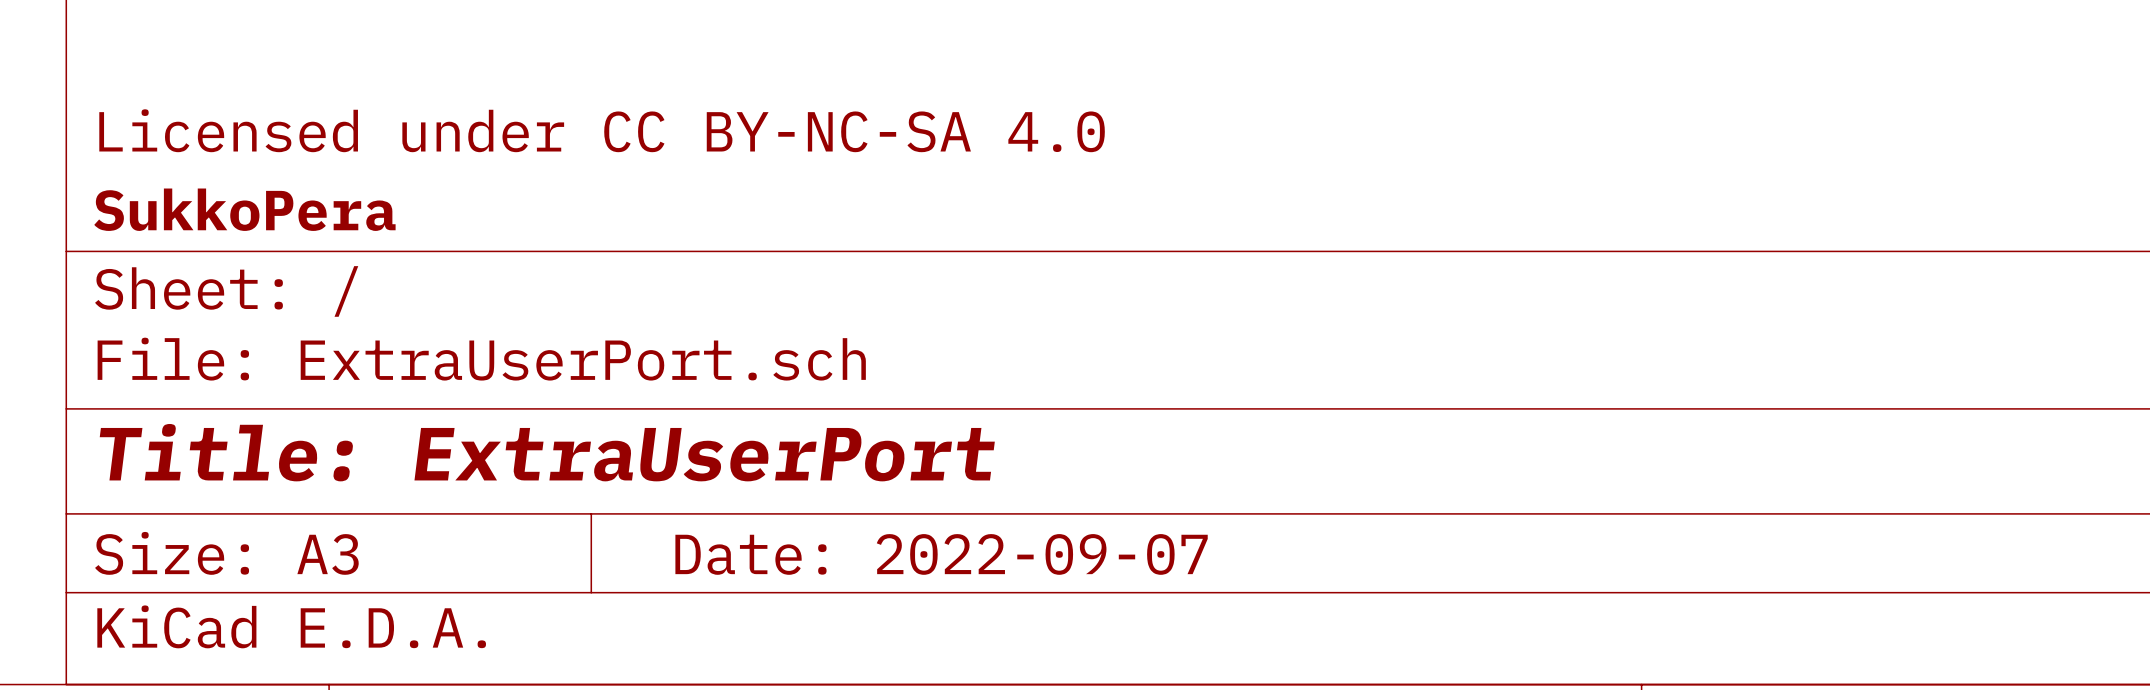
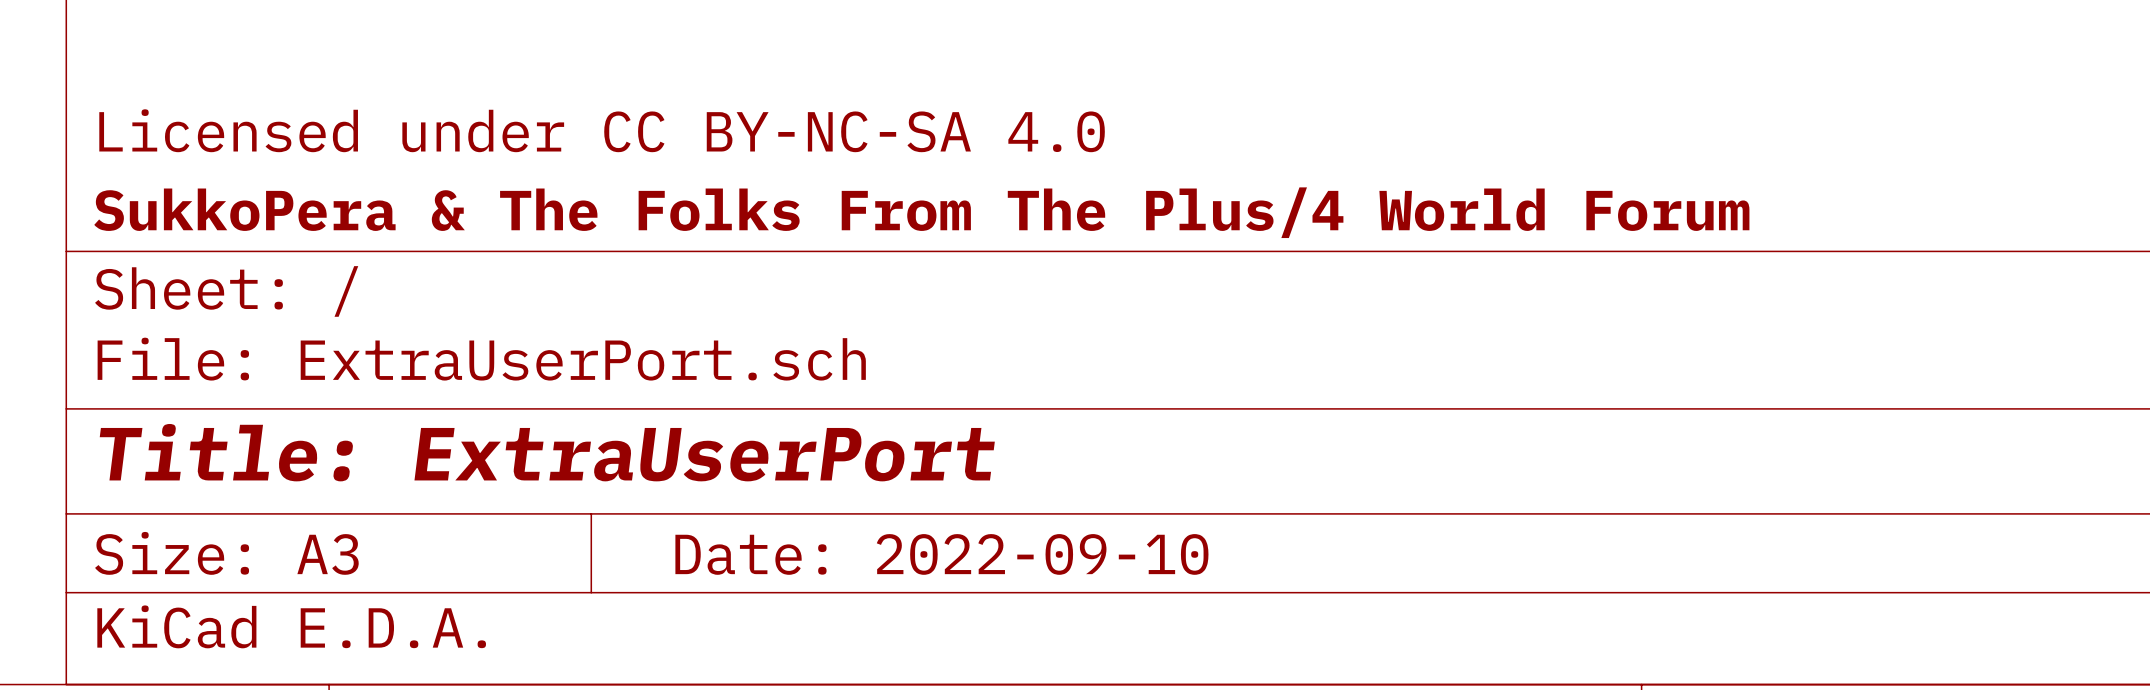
title block: SukkoPera (244, 209) -> SukkoPera & The Folks From The Plus/4 World Forum (921, 212)
title block: Date: 2022-09-07 (941, 554) -> Date: 2022-09-10 (941, 554)

